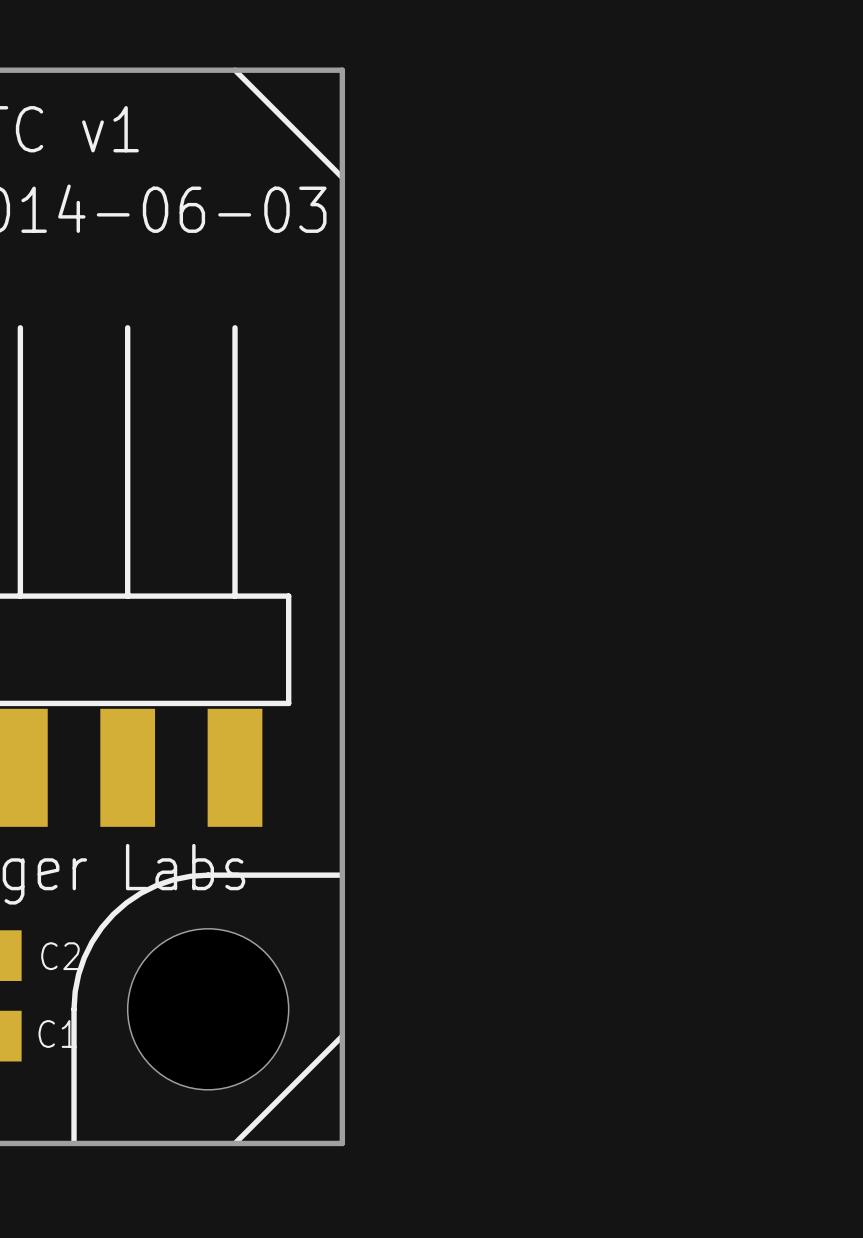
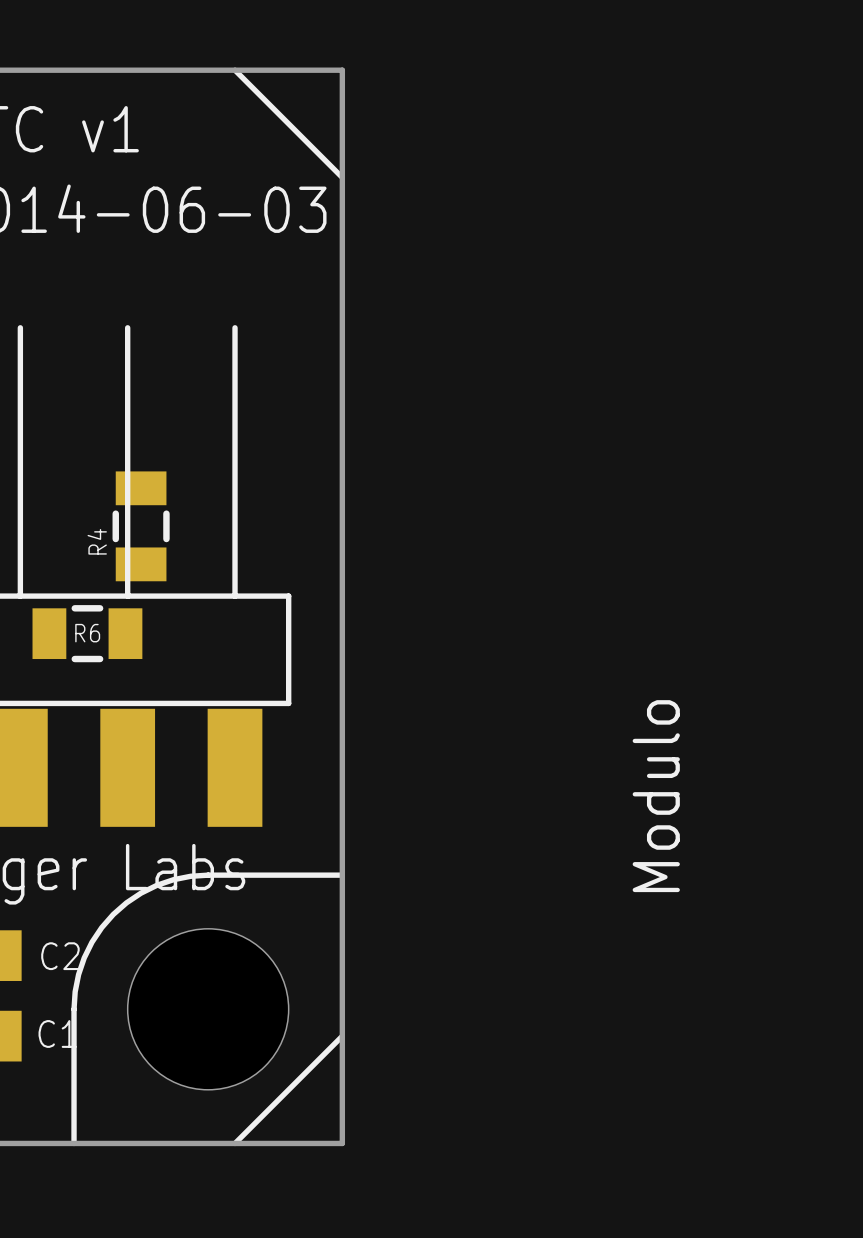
R4: none -> (141, 526)
R6: none -> (87, 633)
text: none -> Modulo (656, 796)

